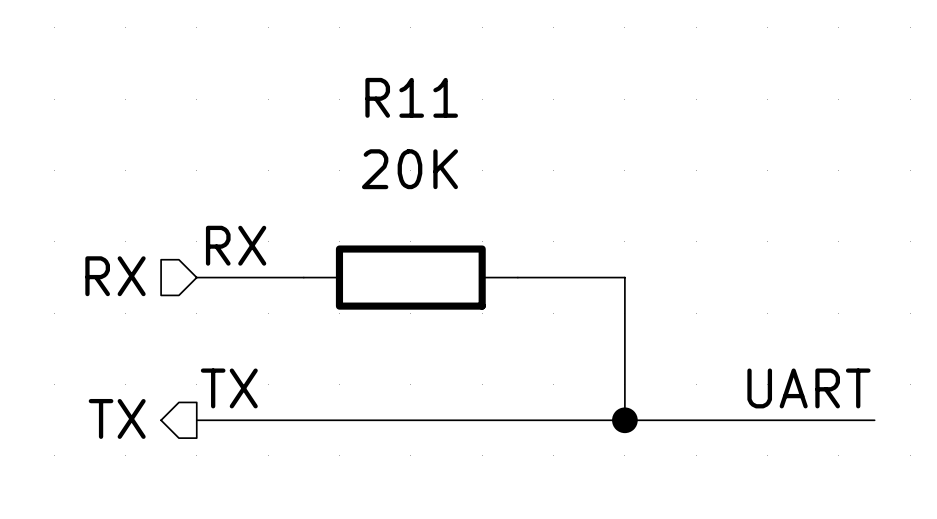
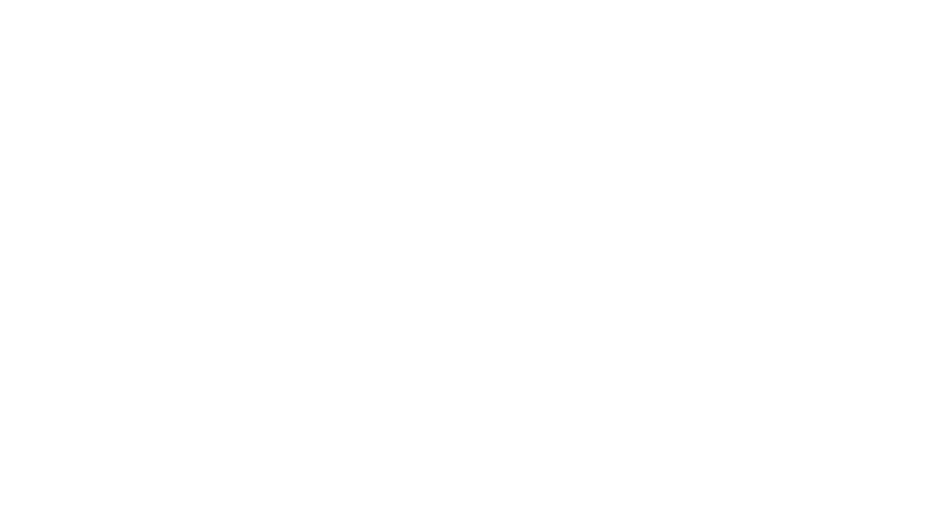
label: RX (236, 245) -> none
hierarchical label: RX (115, 276) -> none
wire: (196, 277) (303, 277) -> none
R11: 20K (410, 277) -> none
wire: (517, 277) (624, 277) (624, 420) -> none
label: TX (229, 388) -> none
label: UART (808, 388) -> none
hierarchical label: TX (117, 418) -> none
wire: (196, 420) (874, 420) -> none
junction: (624, 420) -> none

